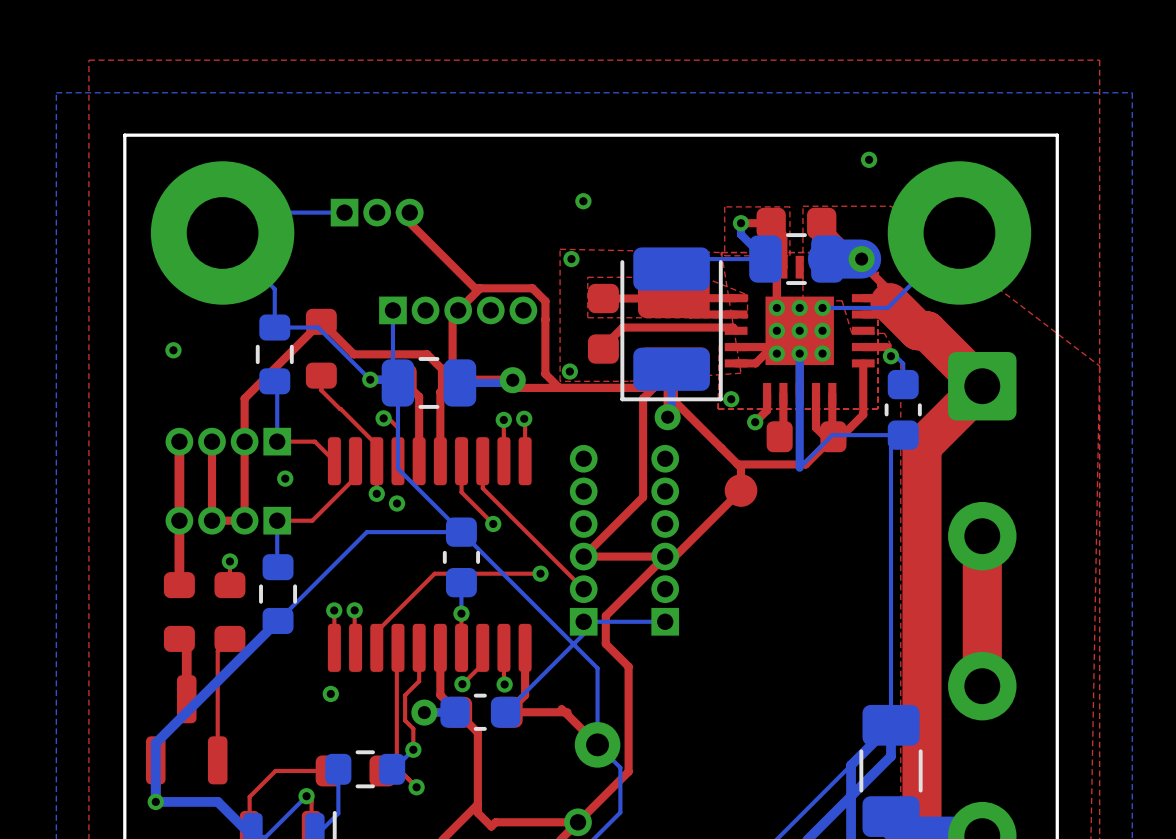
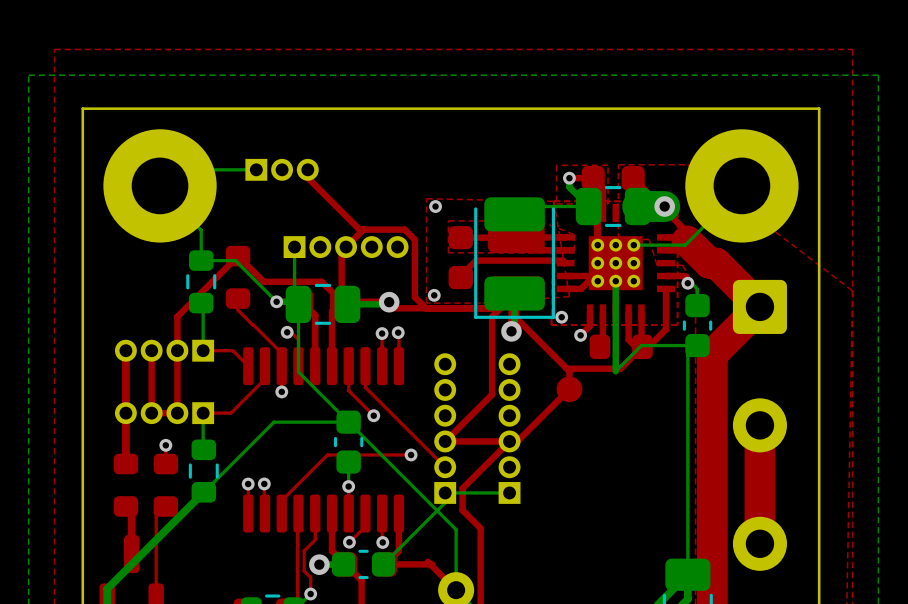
via: (869, 159) -> none
via: (583, 201) -> none
via: (173, 350) -> none
via: (285, 478) -> none
via: (397, 503) -> none
via: (330, 693) -> none

